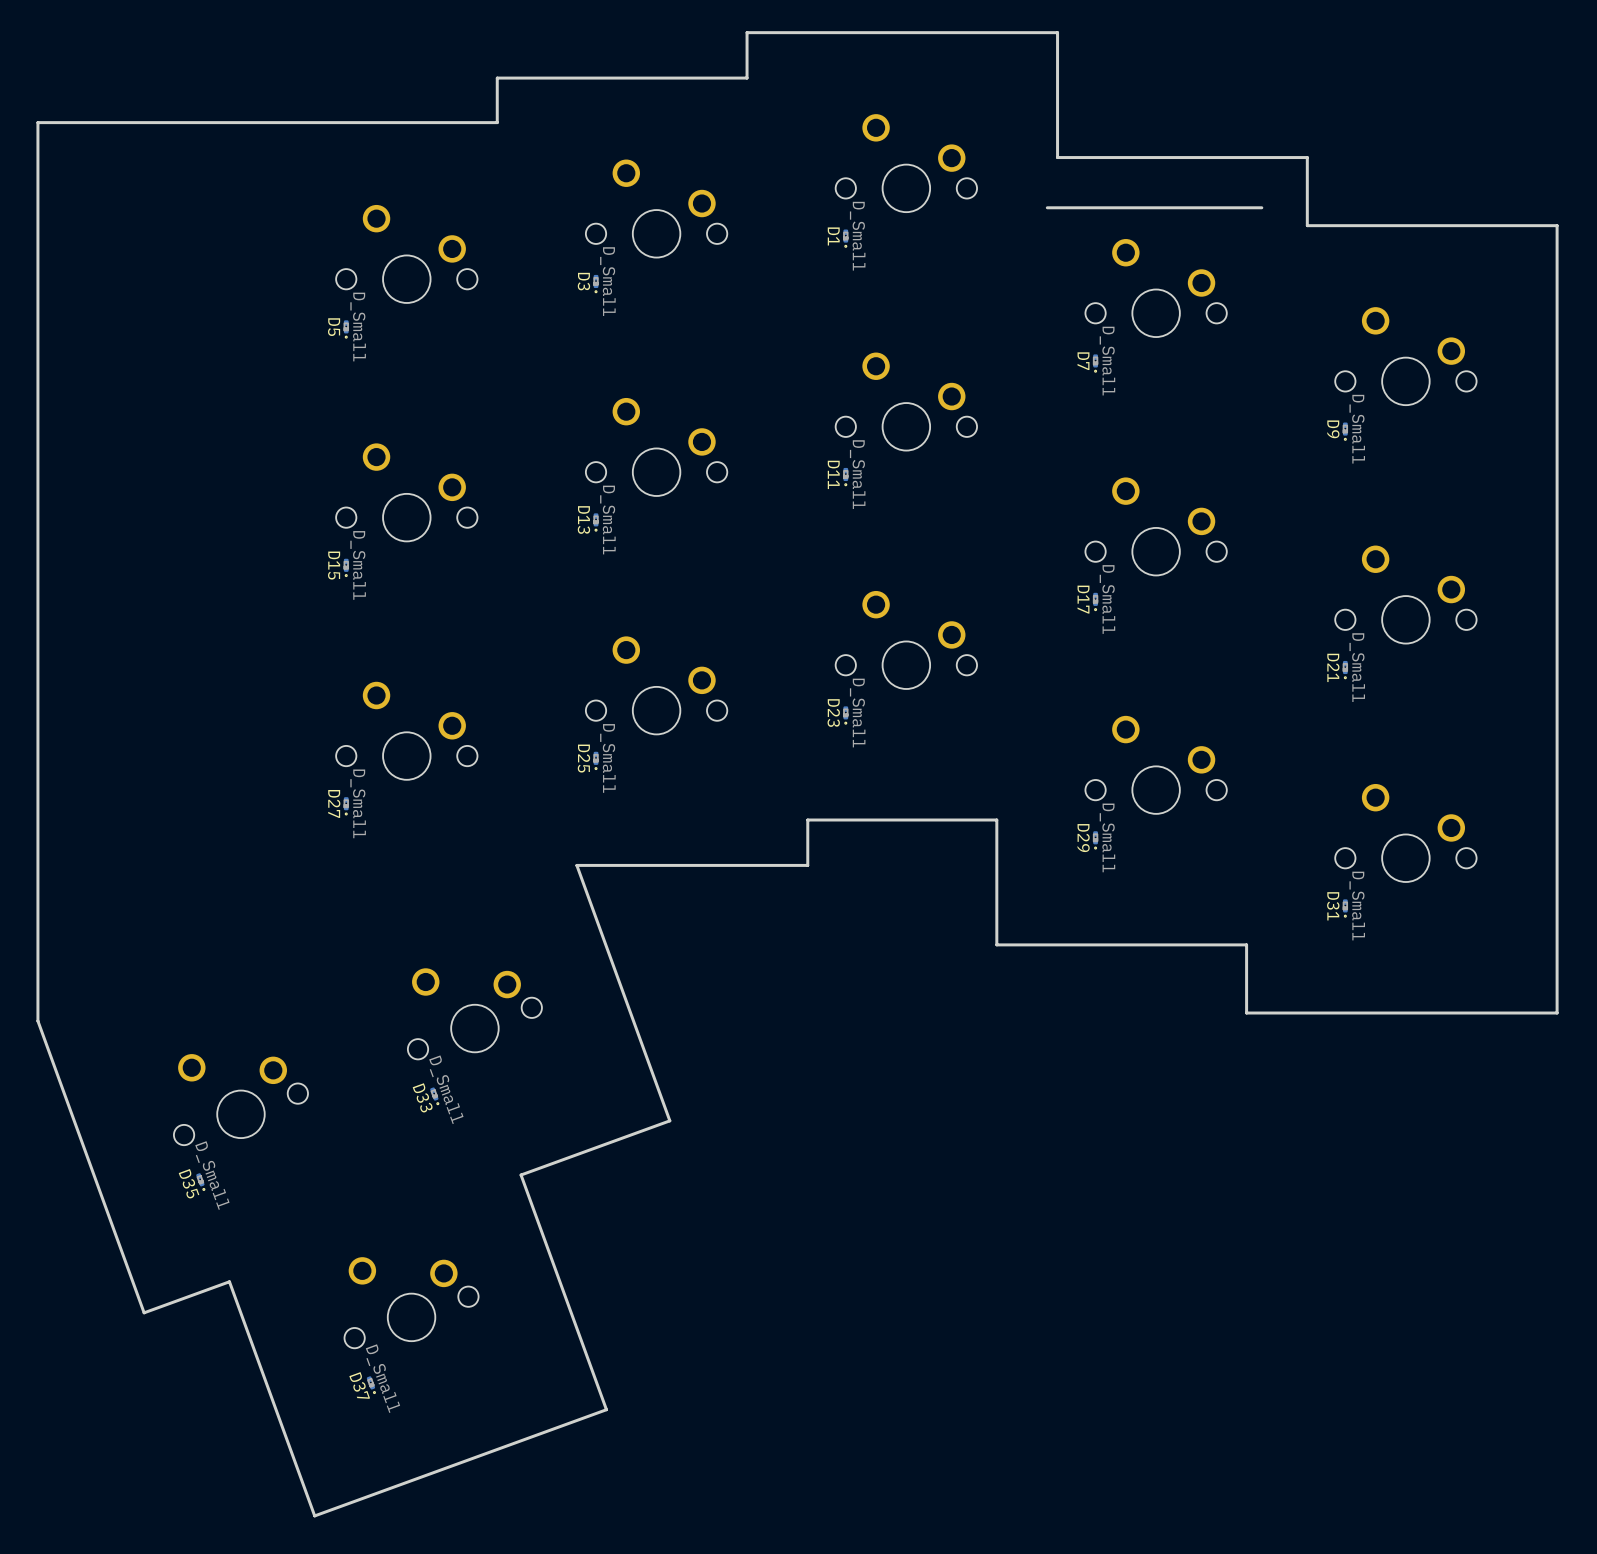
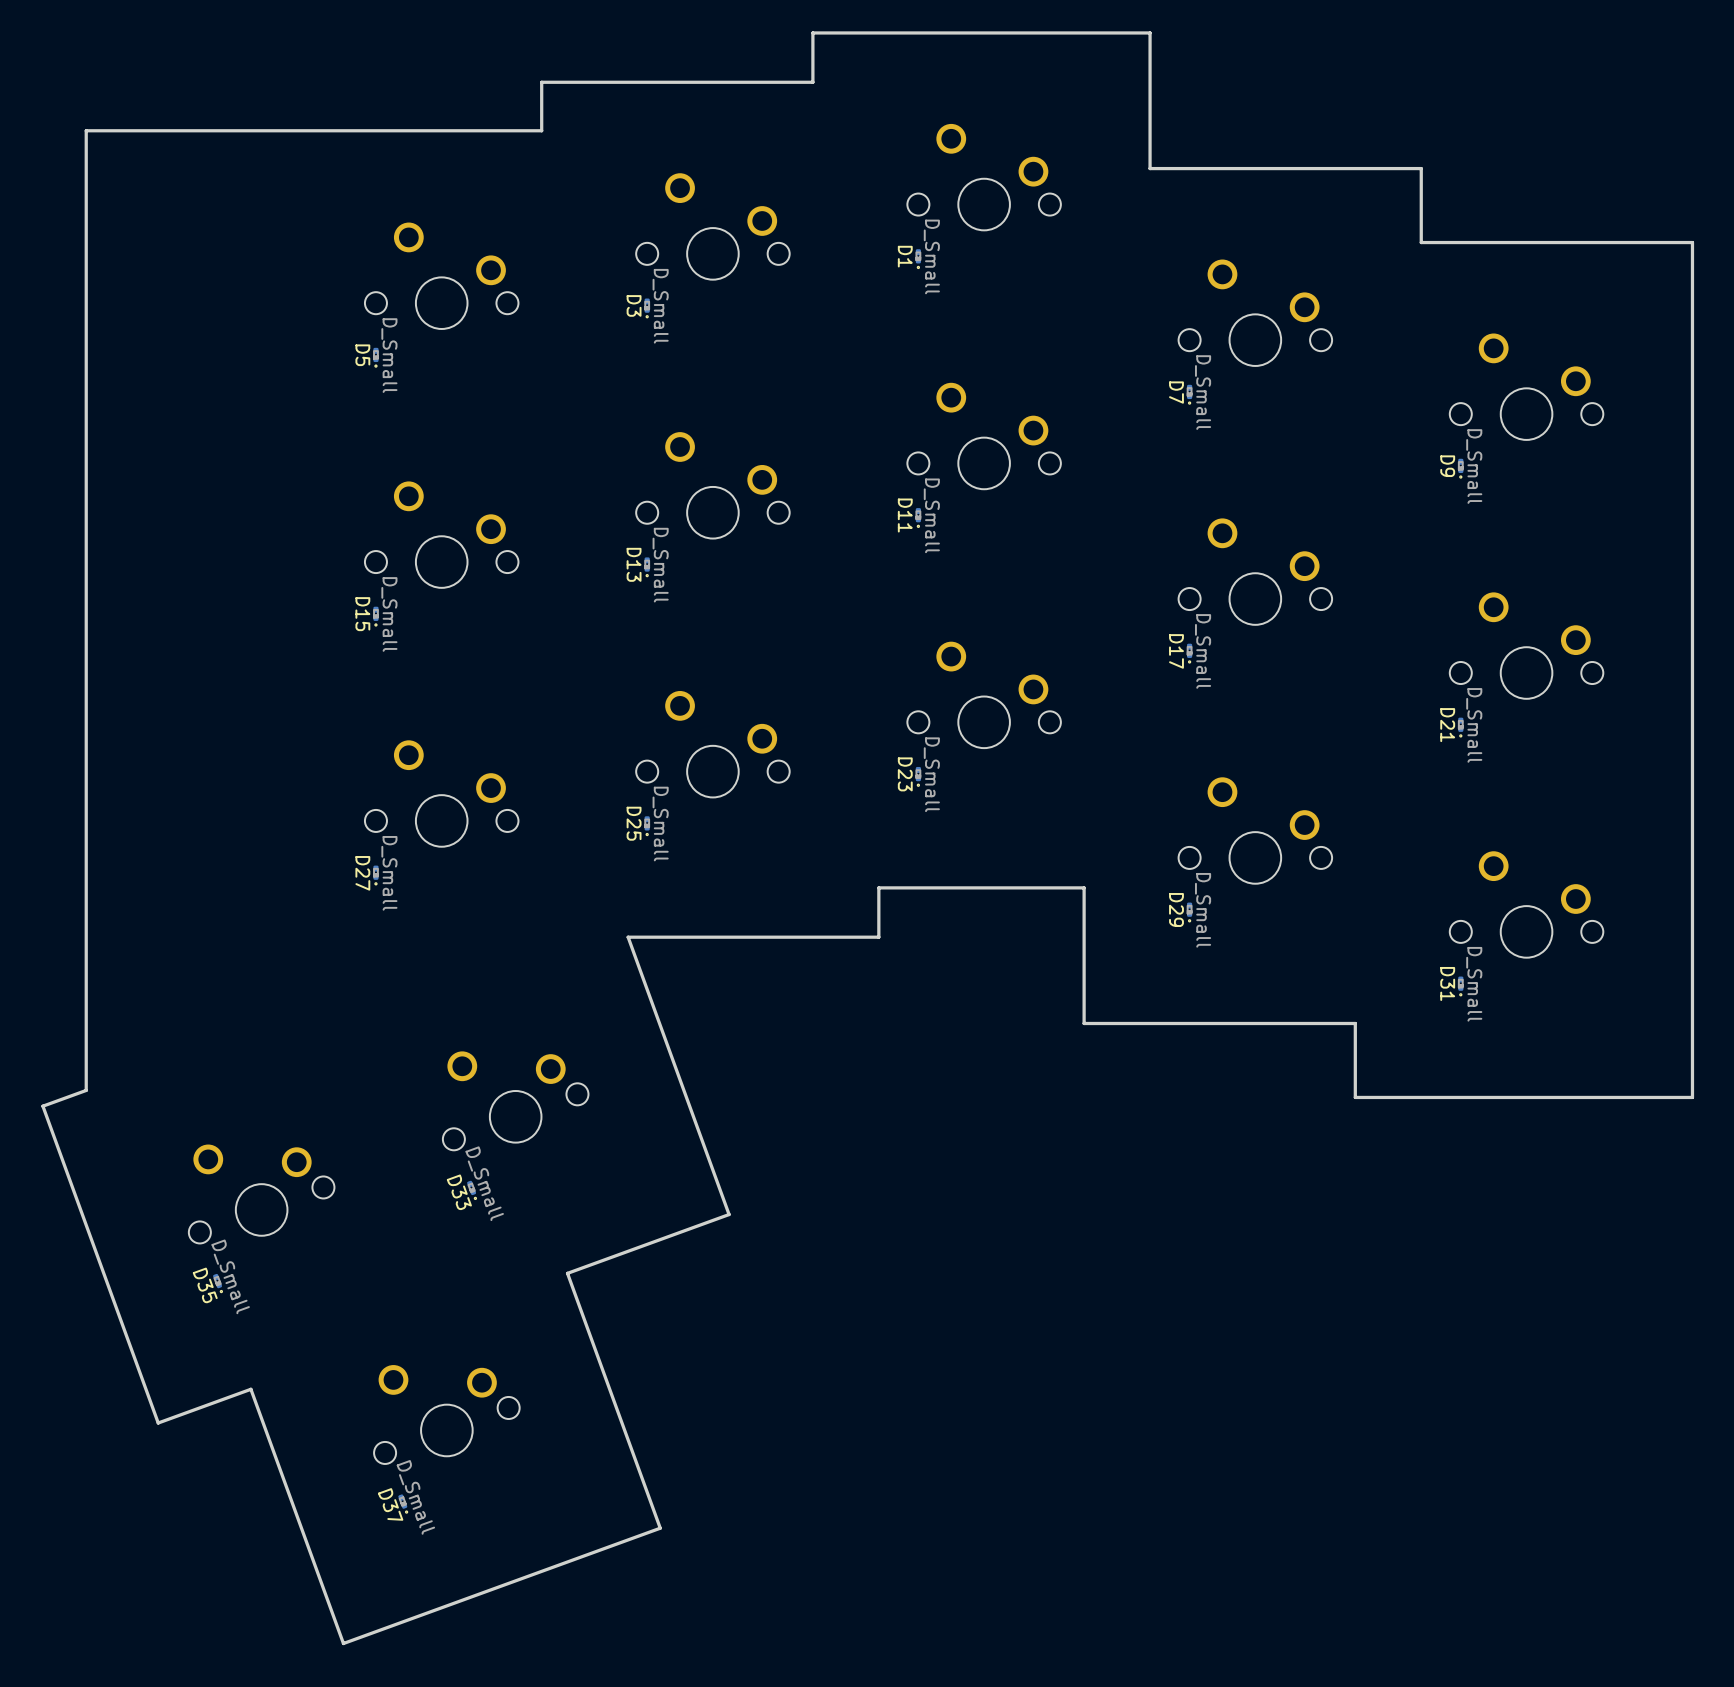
board edge: (1057, 32) (1057, 157) (1307, 157) (1307, 225) (1557, 225) (1557, 1013) (1246, 1013) (1246, 944) (996, 944) (996, 820) (807, 820) (807, 865) (576, 865) (669, 1120) (521, 1175) (606, 1409) (314, 1515) (229, 1281) (144, 1312) (37, 1021) (37, 122) (497, 122) (497, 78) (747, 78) (747, 32) (1057, 32) -> (1150, 32) (1150, 168) (1421, 168) (1421, 242) (1692, 242) (1692, 1097) (1355, 1097) (1355, 1023) (1084, 1023) (1084, 887) (878, 887) (878, 937) (628, 937) (729, 1214) (567, 1273) (660, 1528) (343, 1643) (250, 1389) (158, 1423) (42, 1106) (86, 1090) (86, 130) (541, 130) (541, 82) (812, 82) (812, 32) (1150, 32)
board edge: (1261, 207) (1047, 207) -> none

